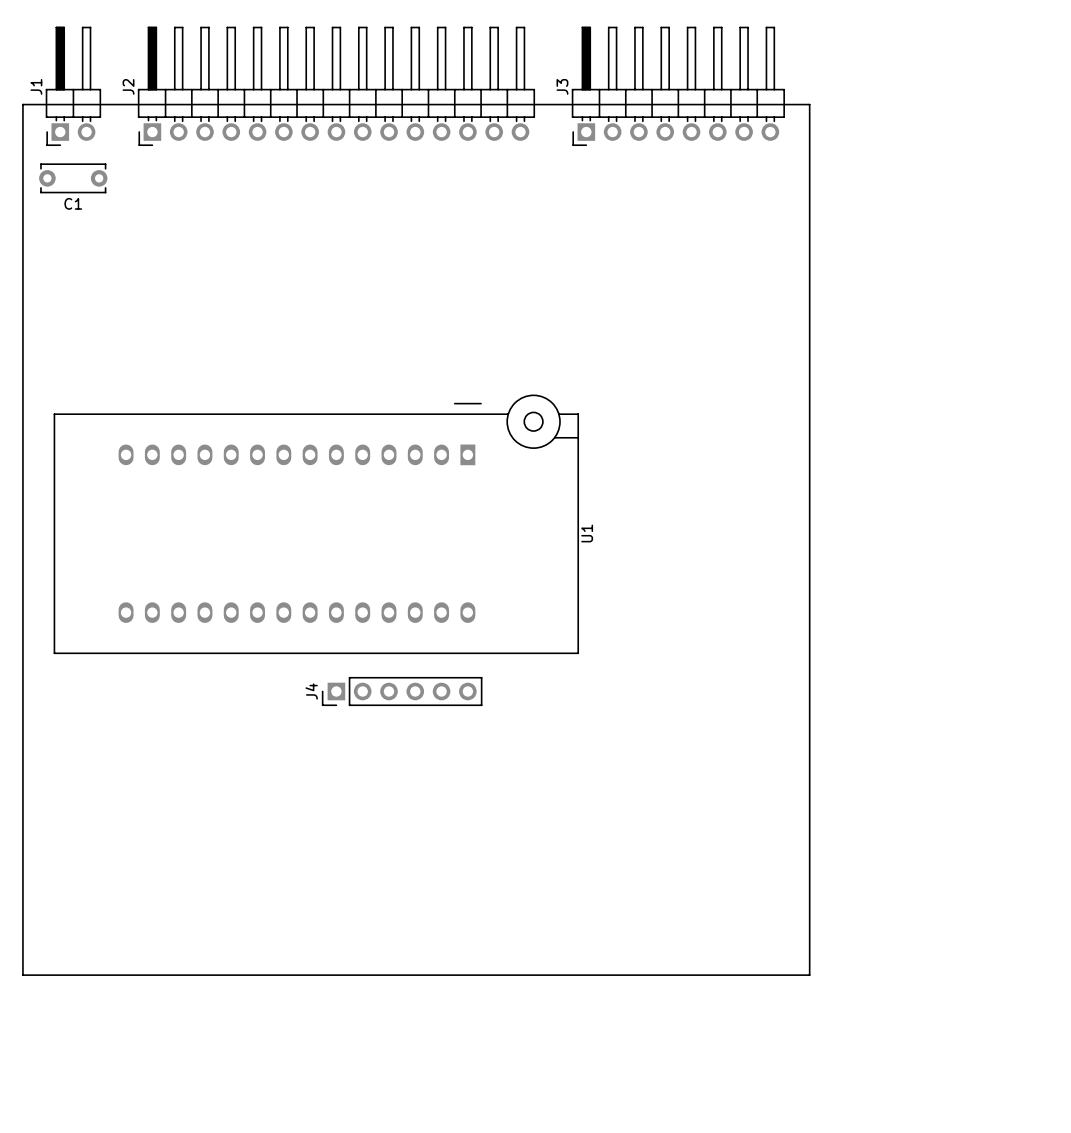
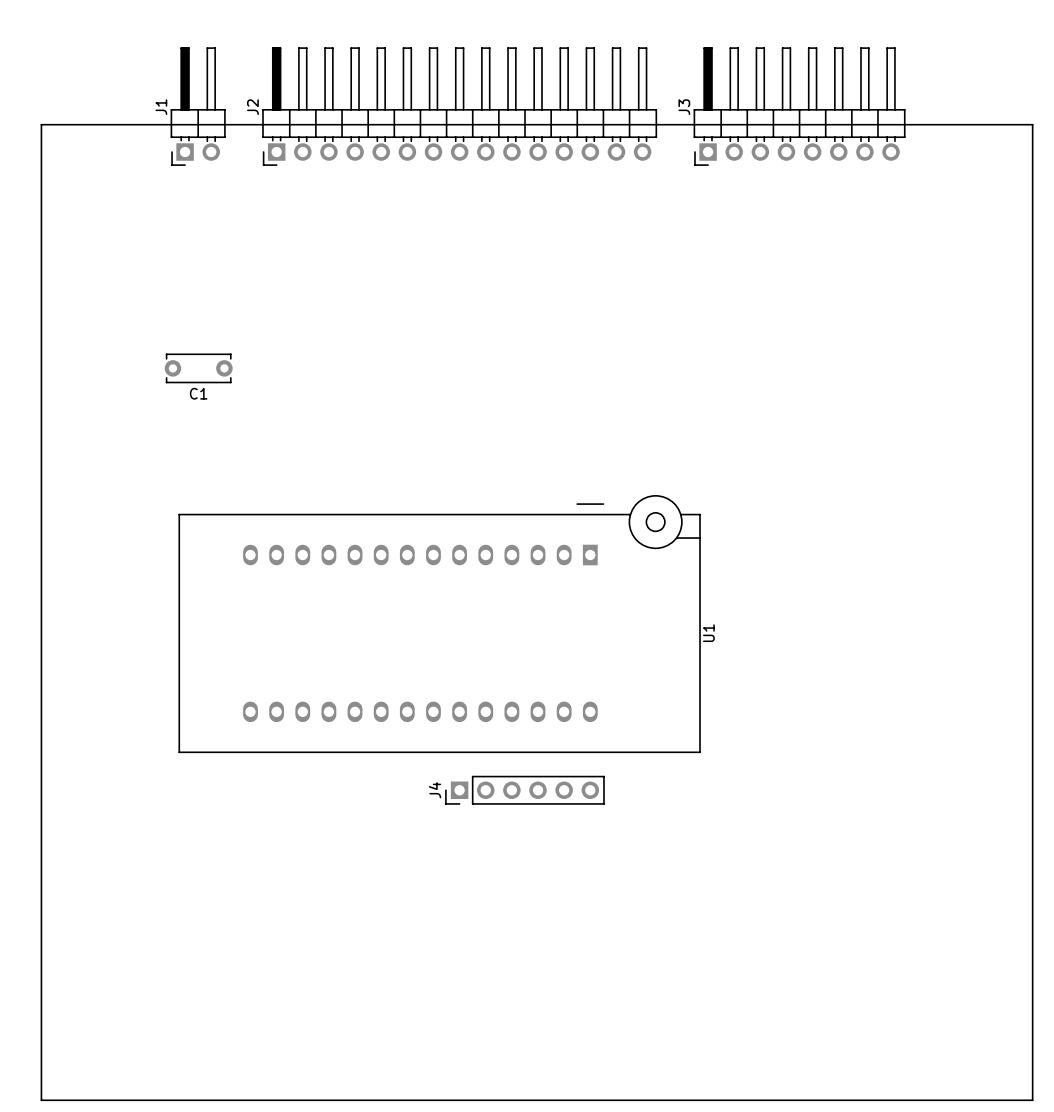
J1 position: (73, 86) -> (198, 106)
J2 position: (336, 86) -> (459, 106)
J3 position: (678, 86) -> (799, 106)
board edge: (22, 104) (22, 975) (809, 975) (809, 104) -> (43, 124) (41, 124) (41, 1100) (1032, 1100) (1032, 124) (825, 124)
C1 position: (73, 178) -> (198, 368)
U1 position: (316, 524) -> (439, 624)
J4 position: (402, 691) -> (524, 790)

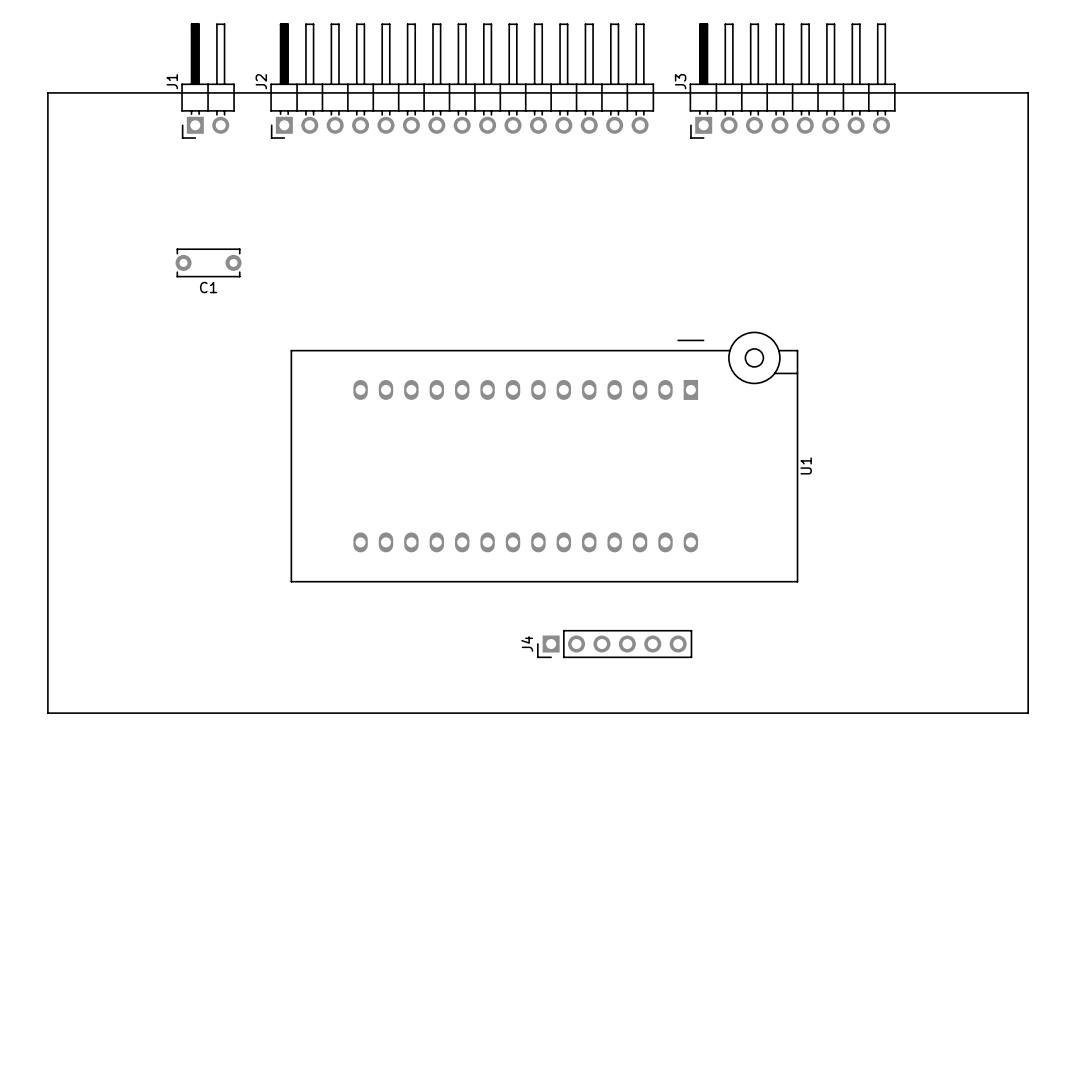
board edge: (41, 124) (1032, 124) (1032, 1100) (41, 1100) (41, 124) -> (47, 92) (47, 713) (1028, 713) (1028, 92) (47, 92)
C1 position: (198, 368) -> (208, 262)
U1 position: (439, 624) -> (544, 457)
J4 position: (524, 790) -> (614, 644)

